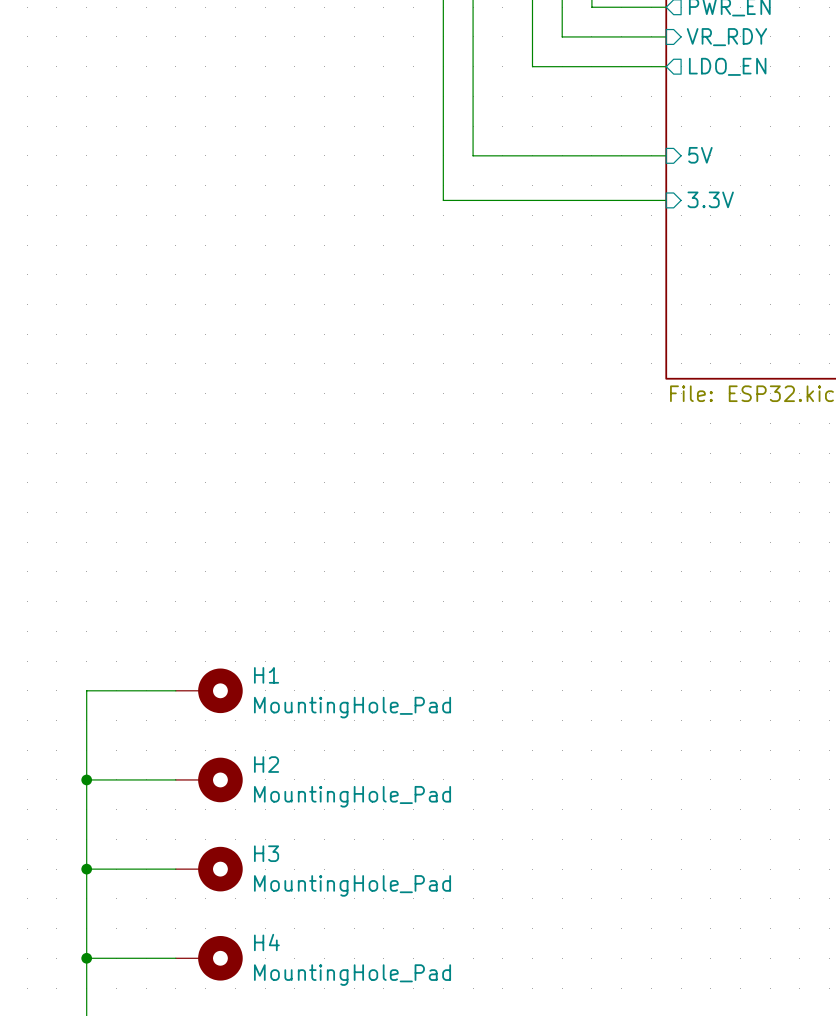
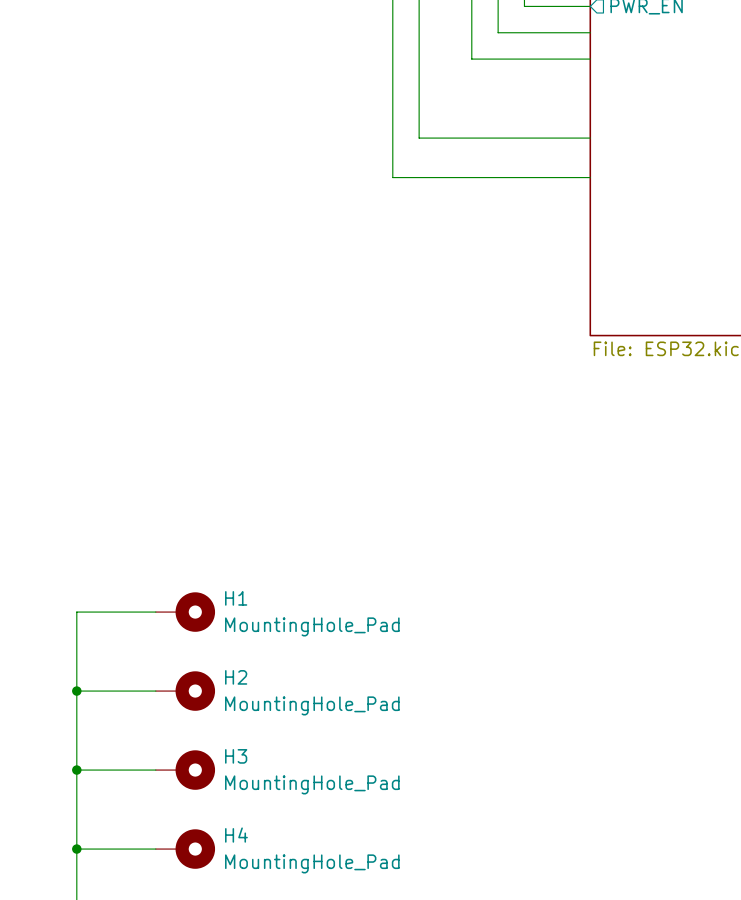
sheet pin: VR_RDY (726, 37) -> none
sheet pin: LDO_EN (727, 66) -> none
sheet pin: 5V (700, 155) -> none
sheet pin: 3.3V (710, 199) -> none

